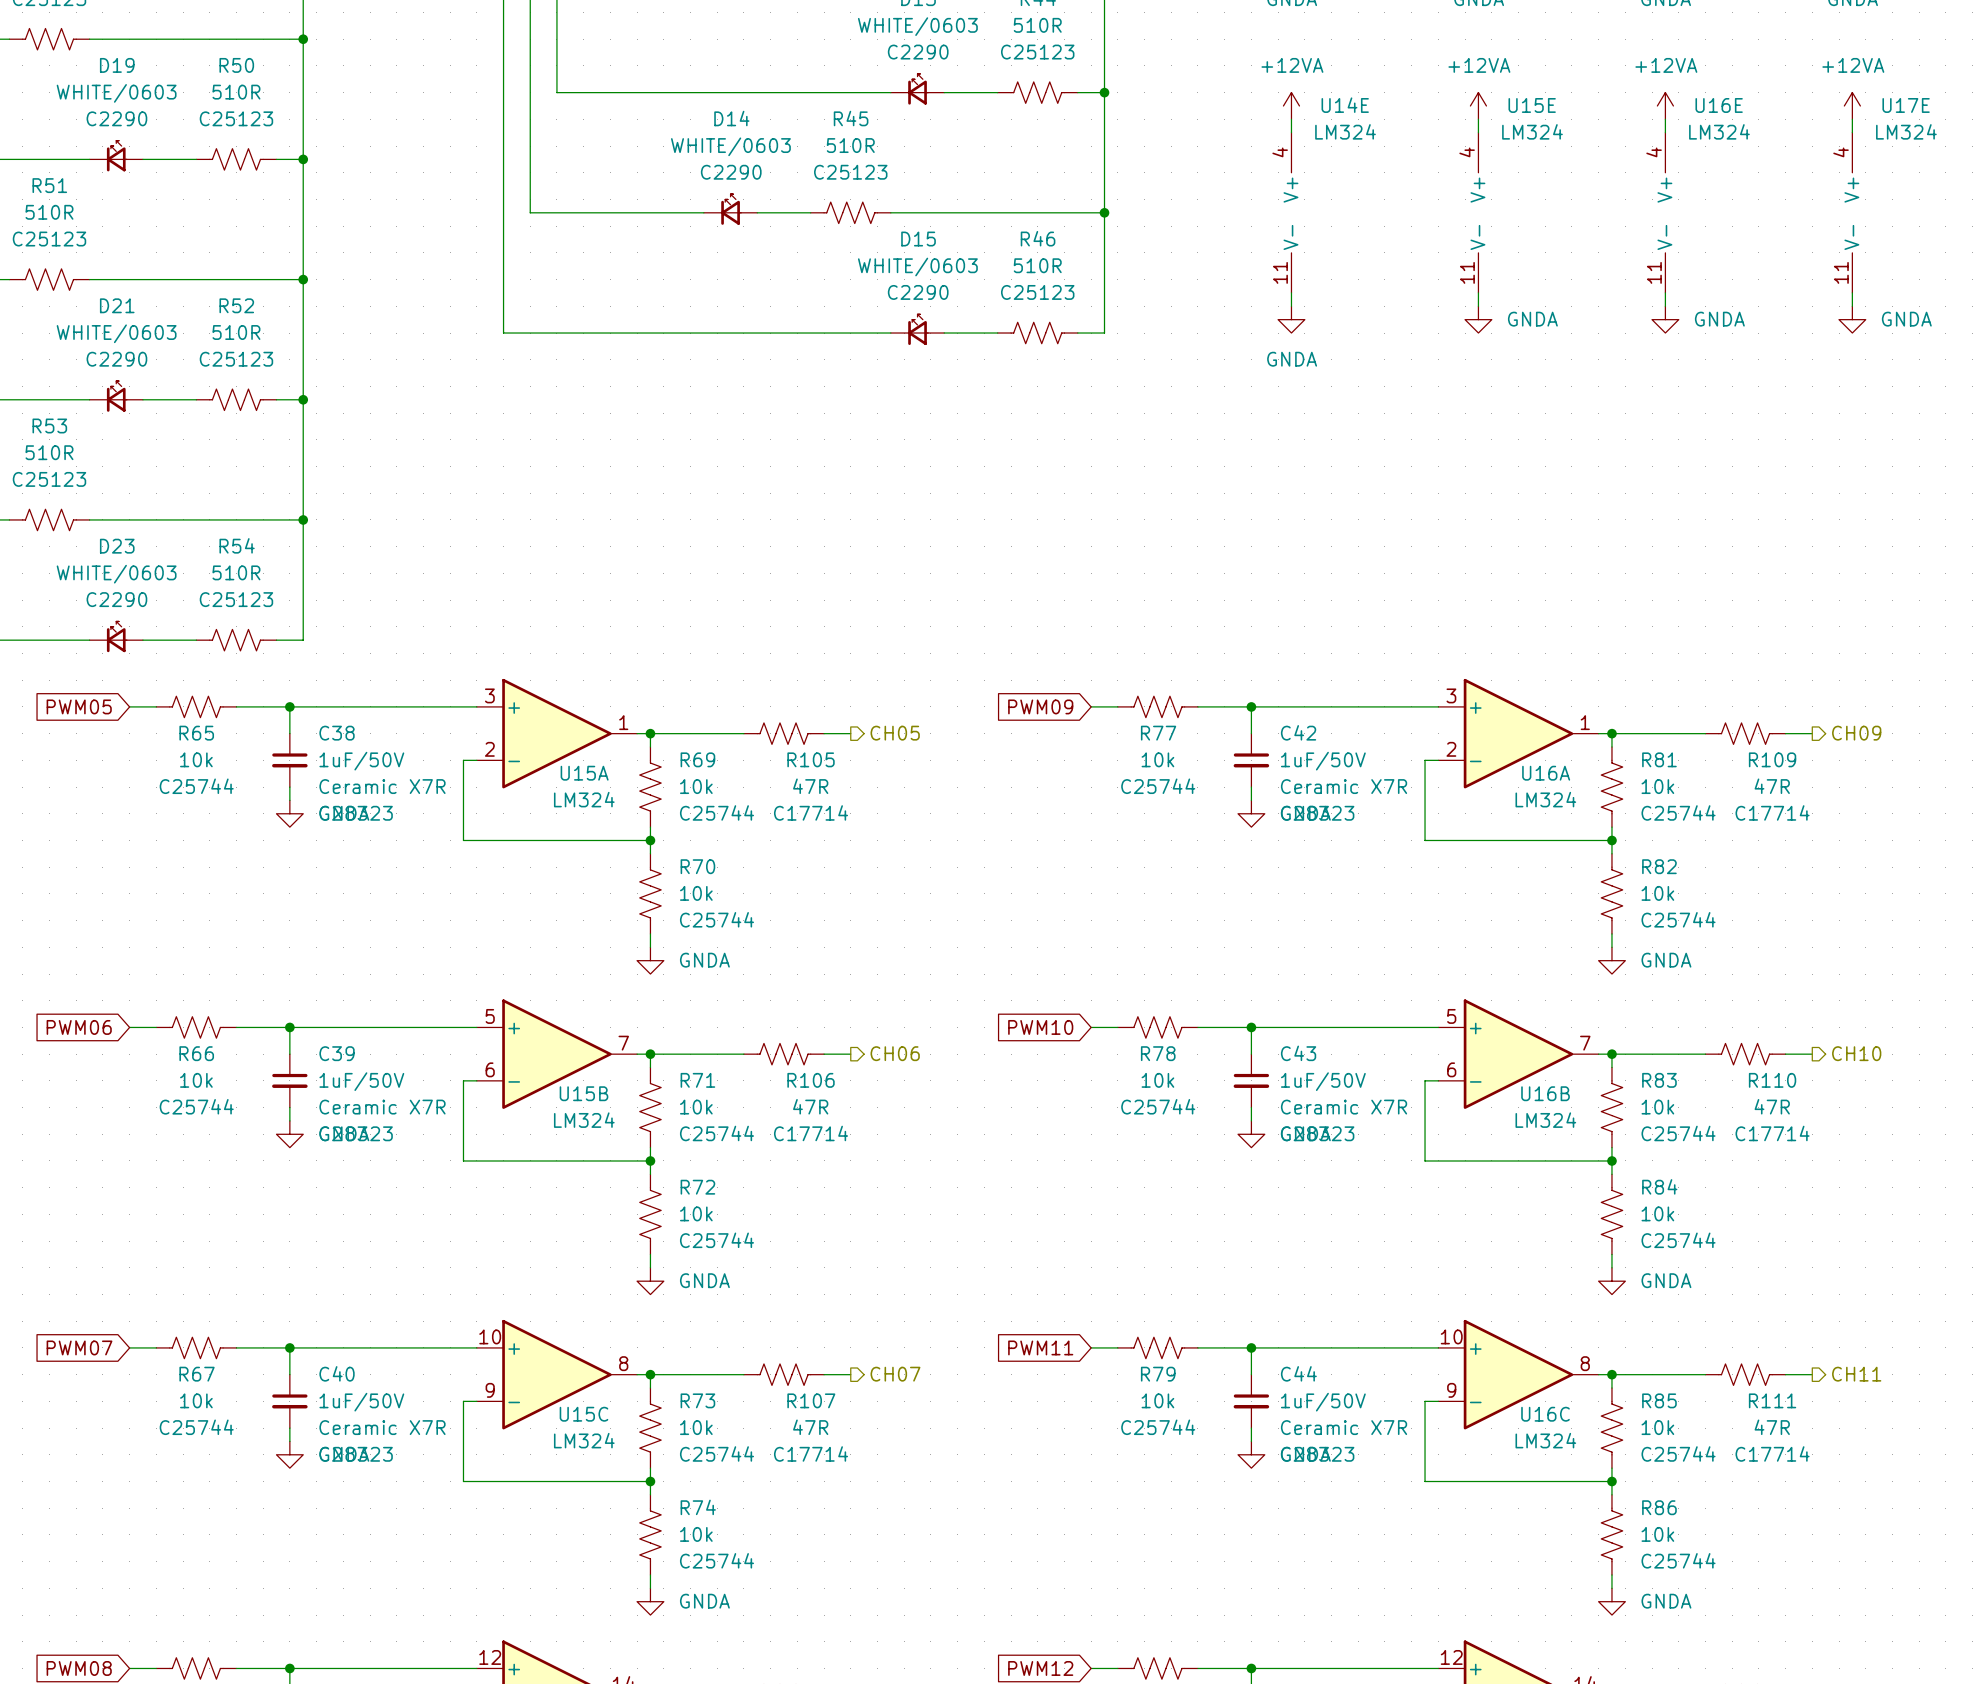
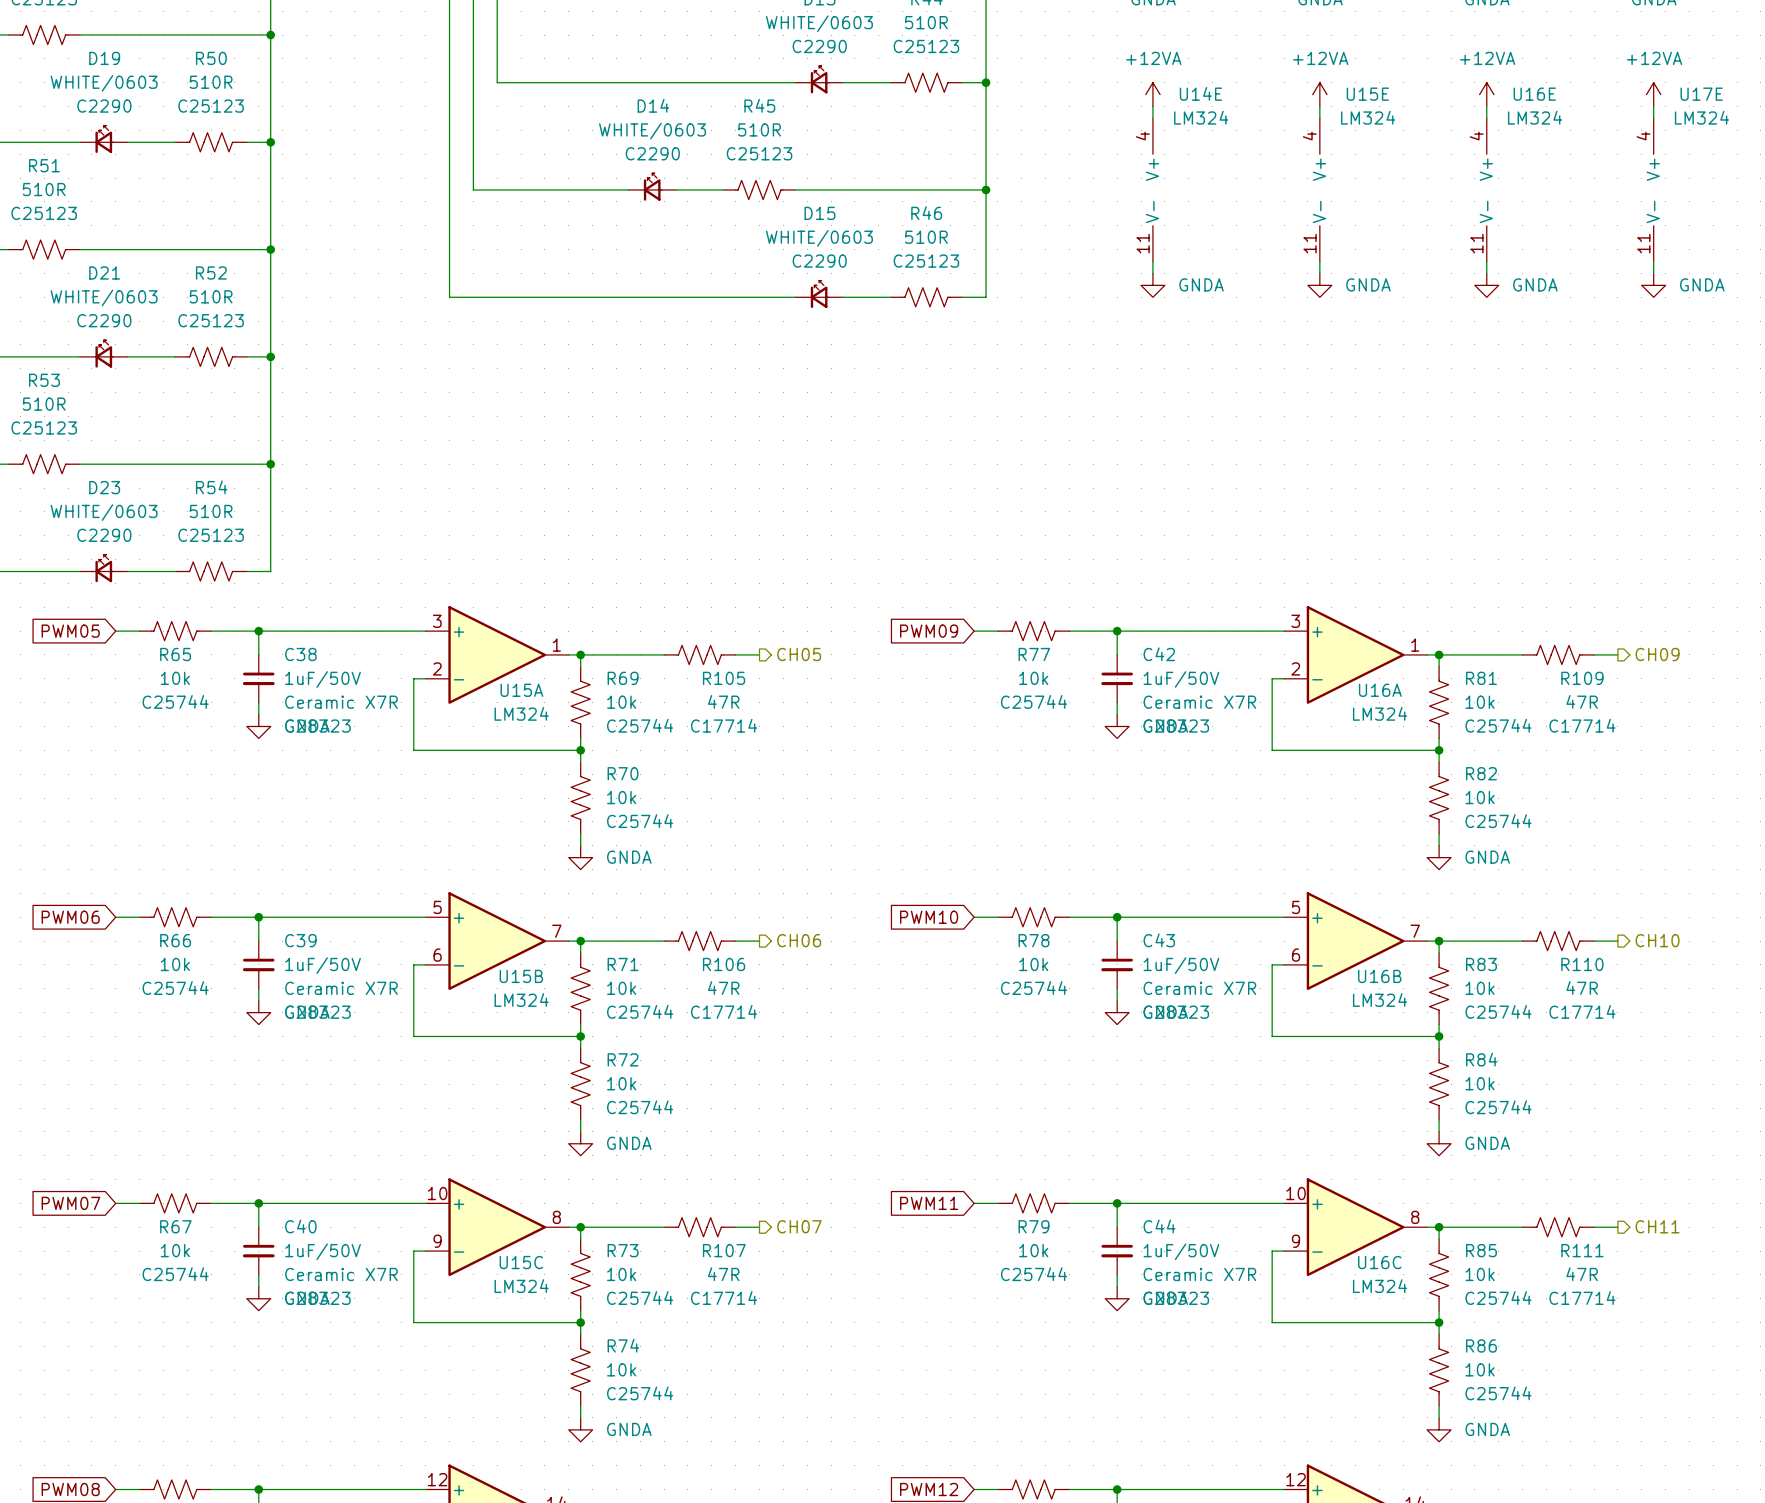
power symbol text position: GNDA (1292, 359) -> GNDA (1201, 284)

